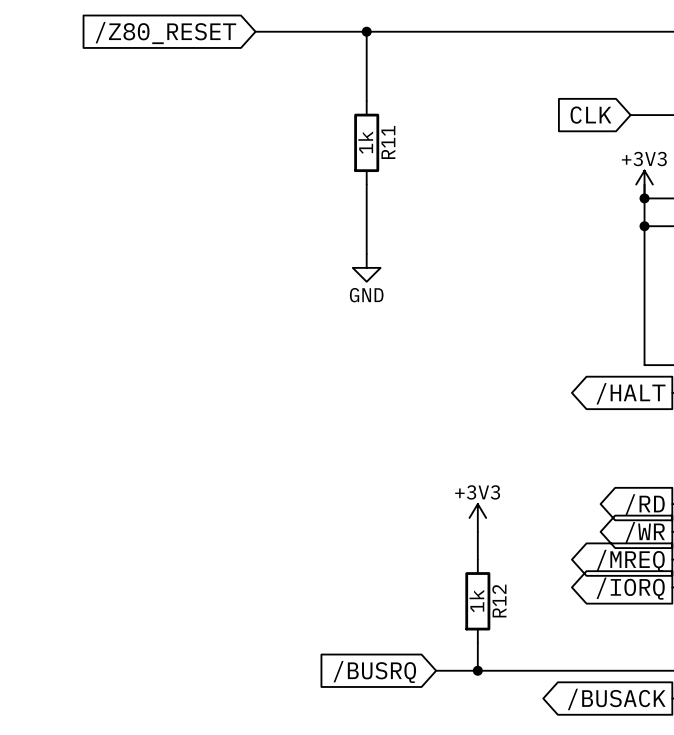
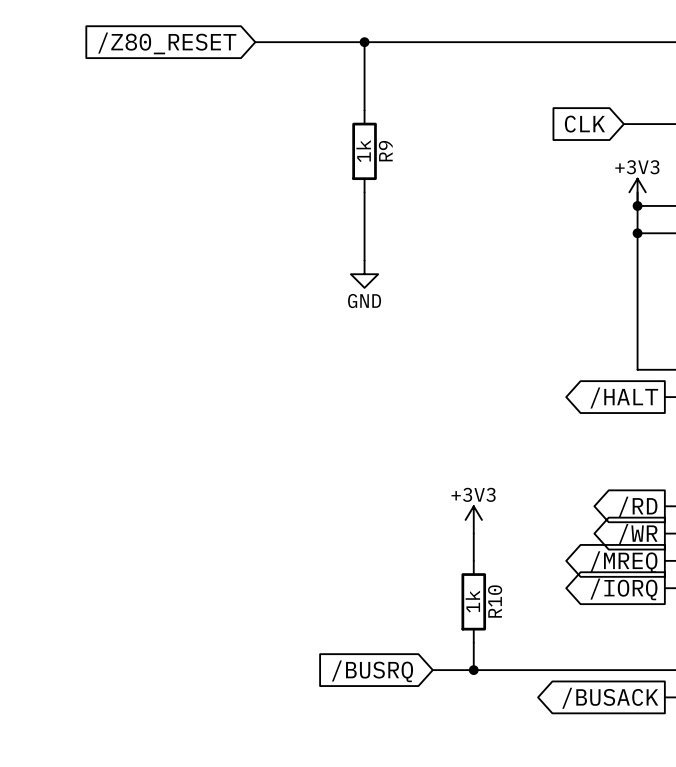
R11 name: R11 (388, 142) -> R9 (385, 151)
R12 name: R12 (499, 601) -> R10 (495, 601)

